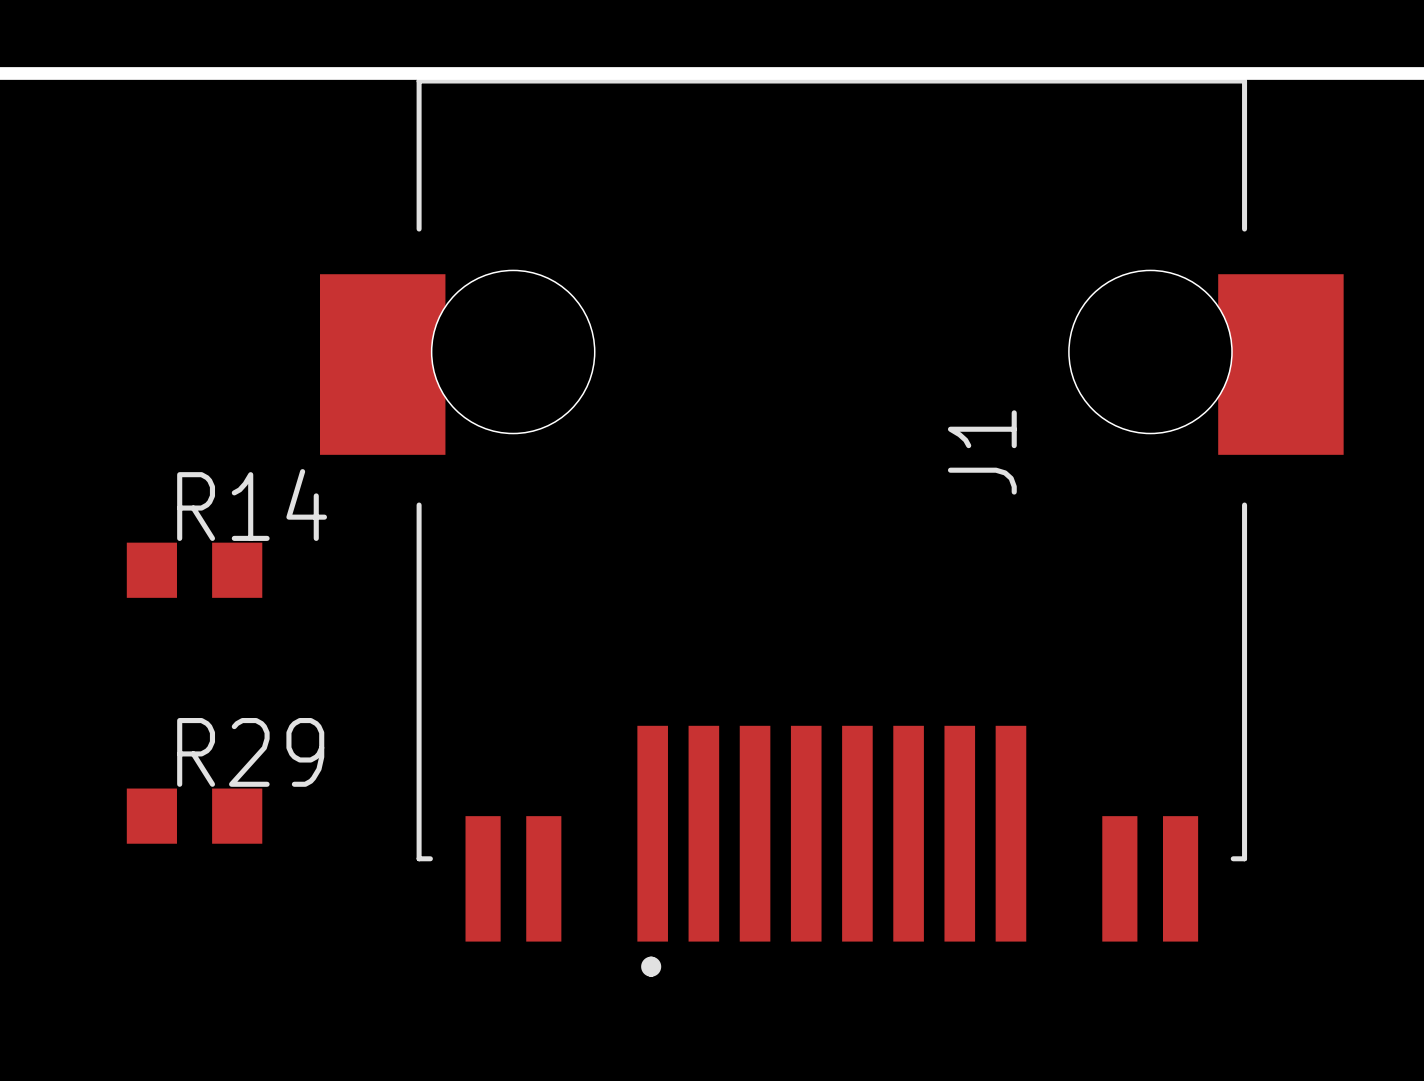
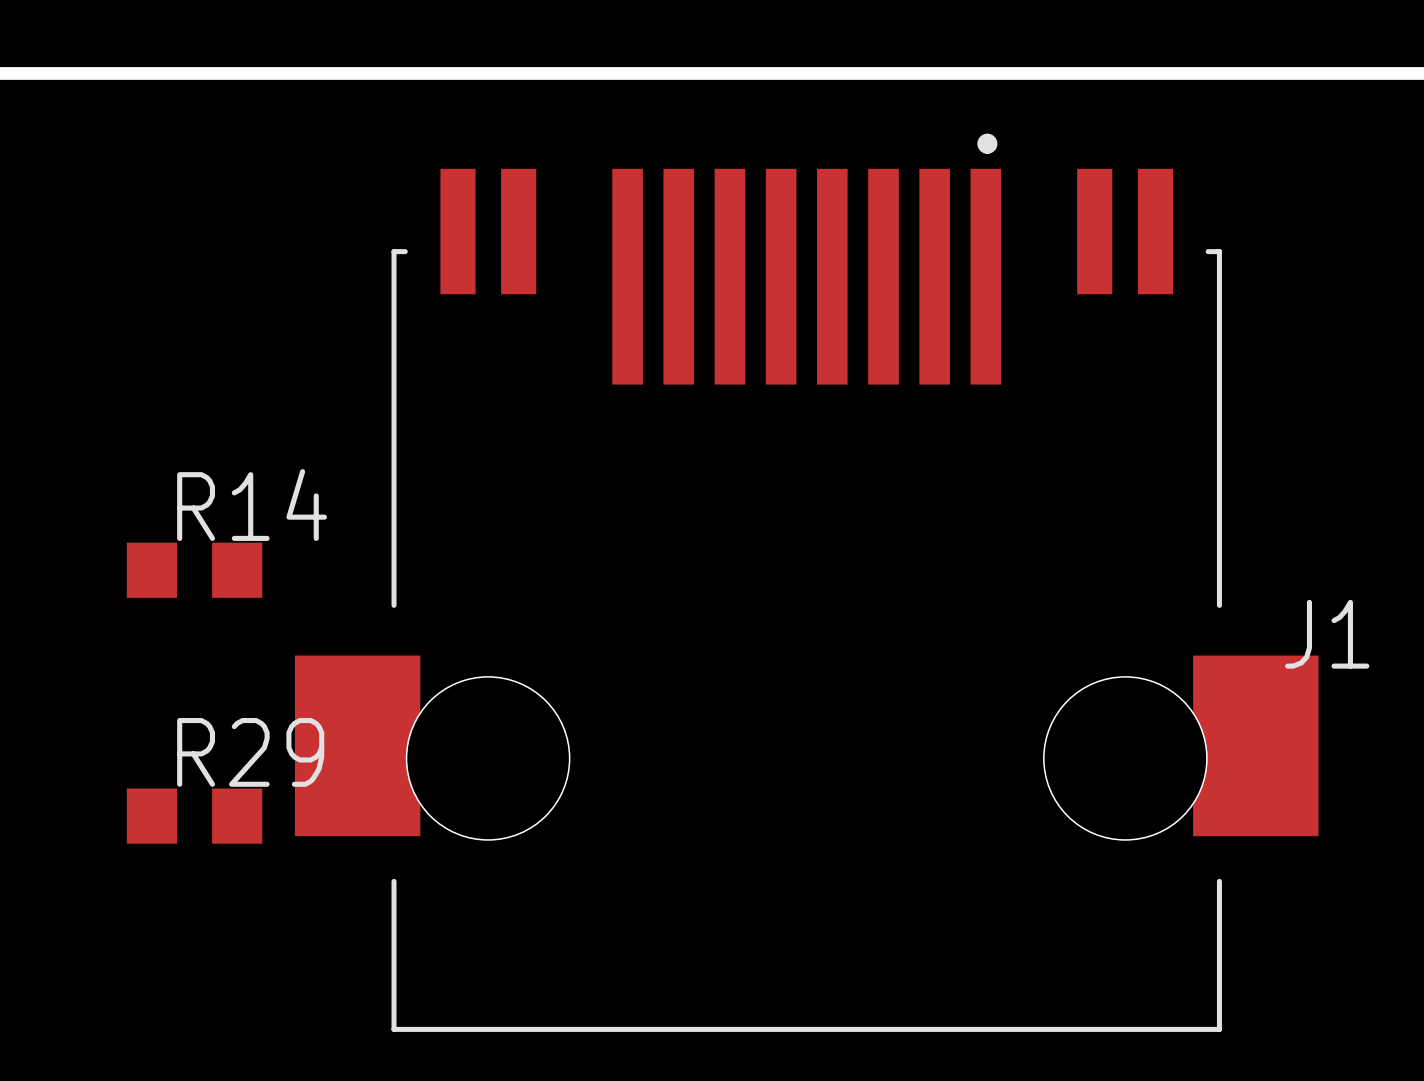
J1 name position: J1 (982, 452) -> J1 (1327, 634)
J1 rotation: 0° (831, 527) -> 180° (806, 582)

